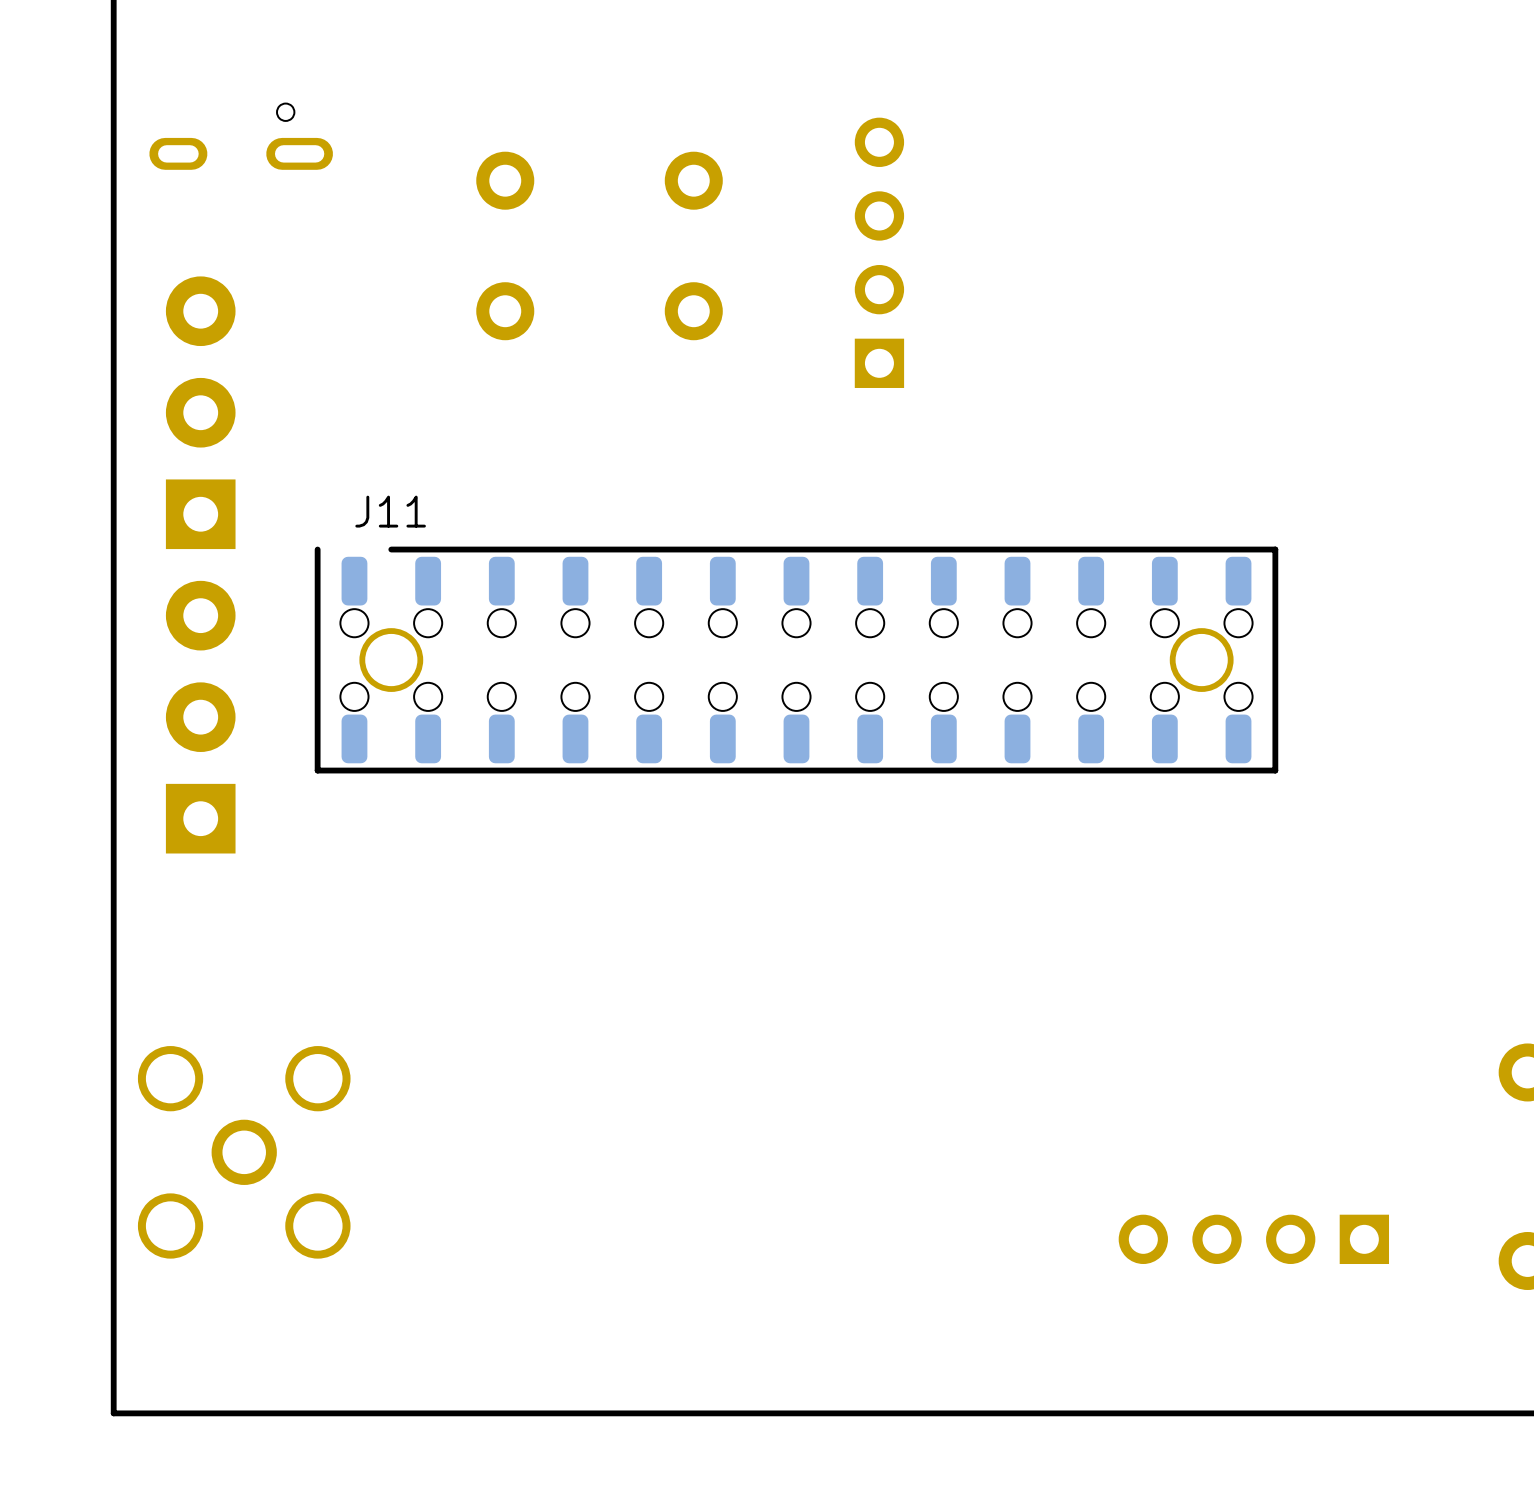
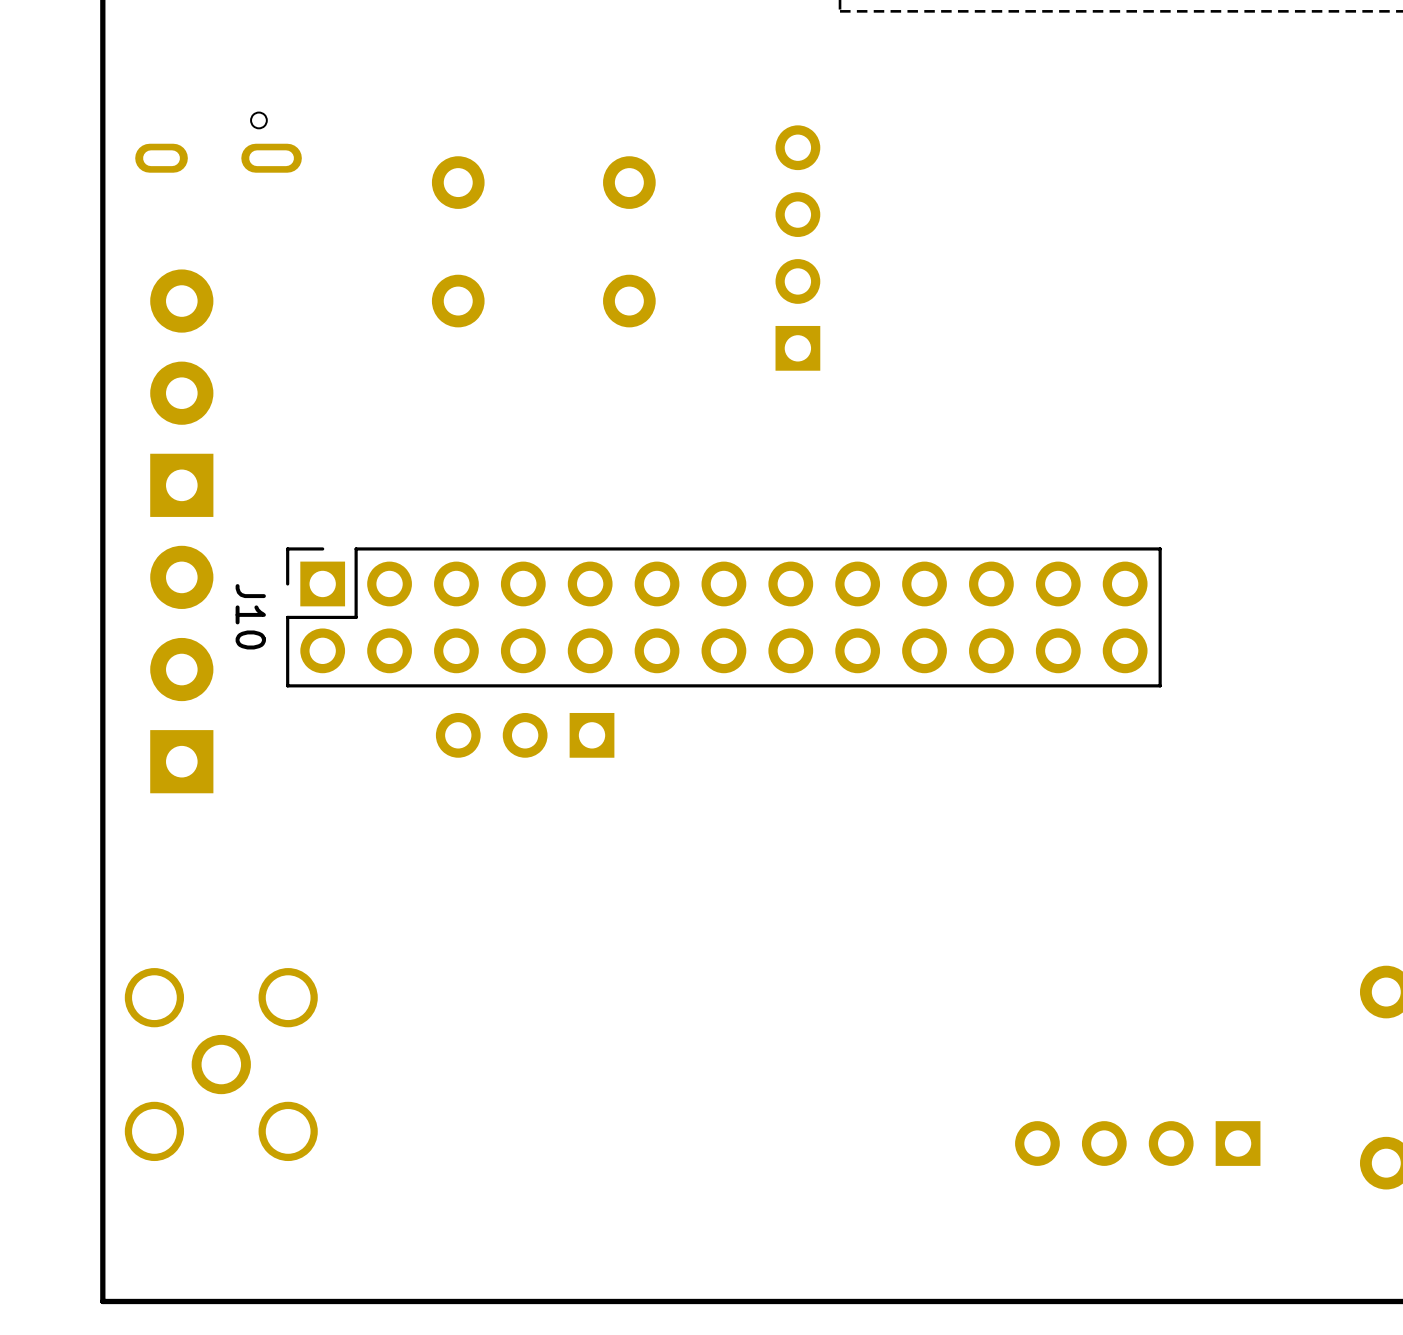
J10: none -> (723, 617)
J11: (796, 660) -> none
part: none -> (525, 735)

